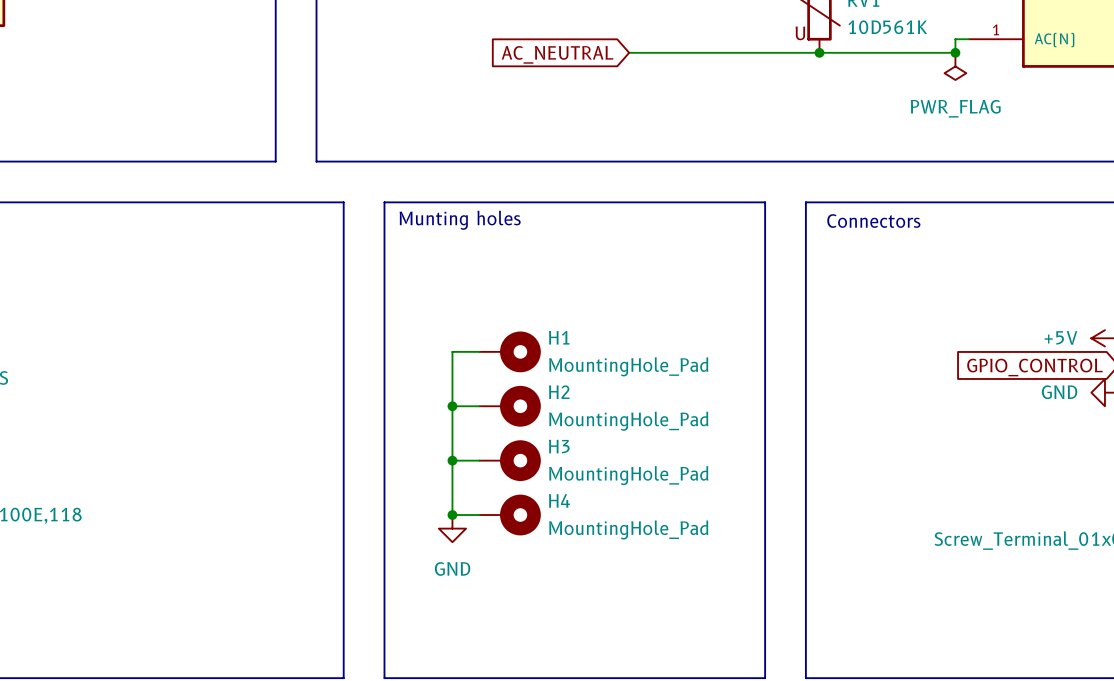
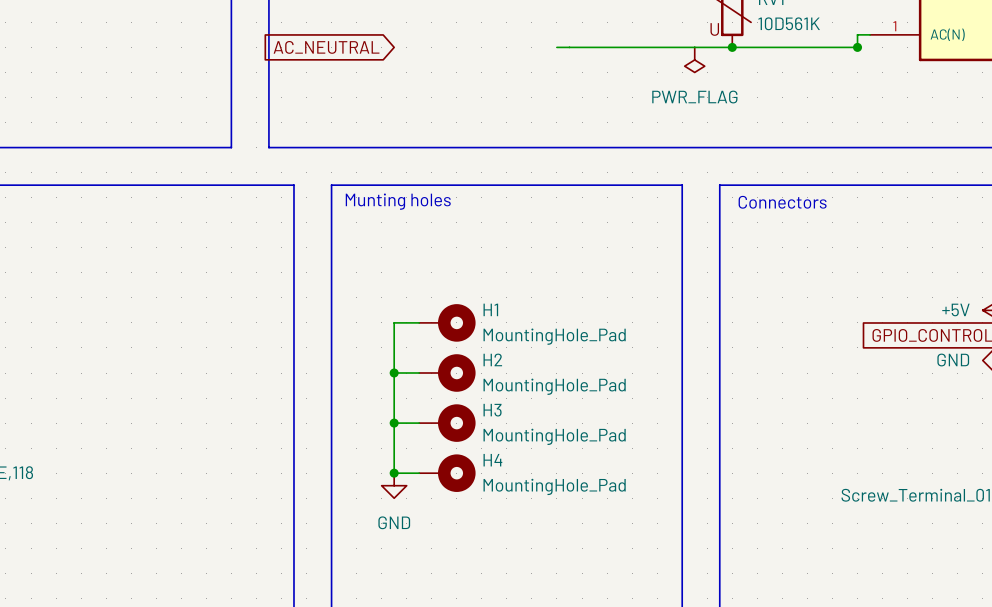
global label position: AC_NEUTRAL (557, 54) -> AC_NEUTRAL (326, 47)
power symbol: none -> PWR_FLAG (694, 59)
power symbol: PWR_FLAG (955, 66) -> none

